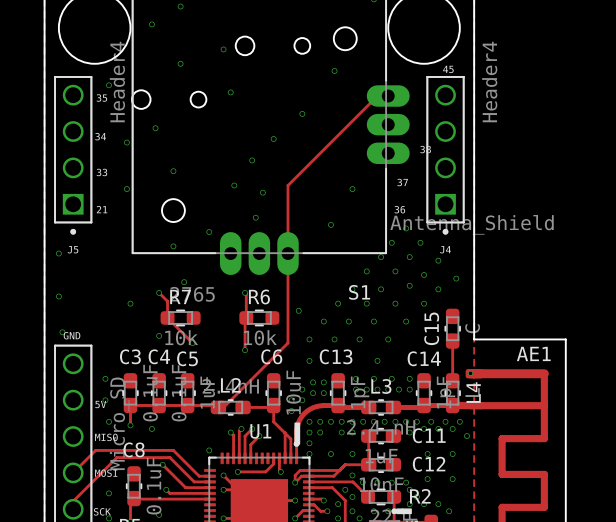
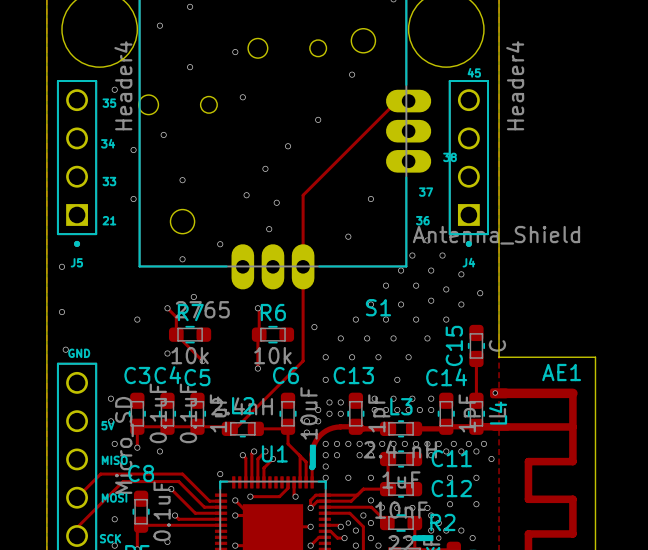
via: none -> (348, 523)
via: none -> (438, 538)

